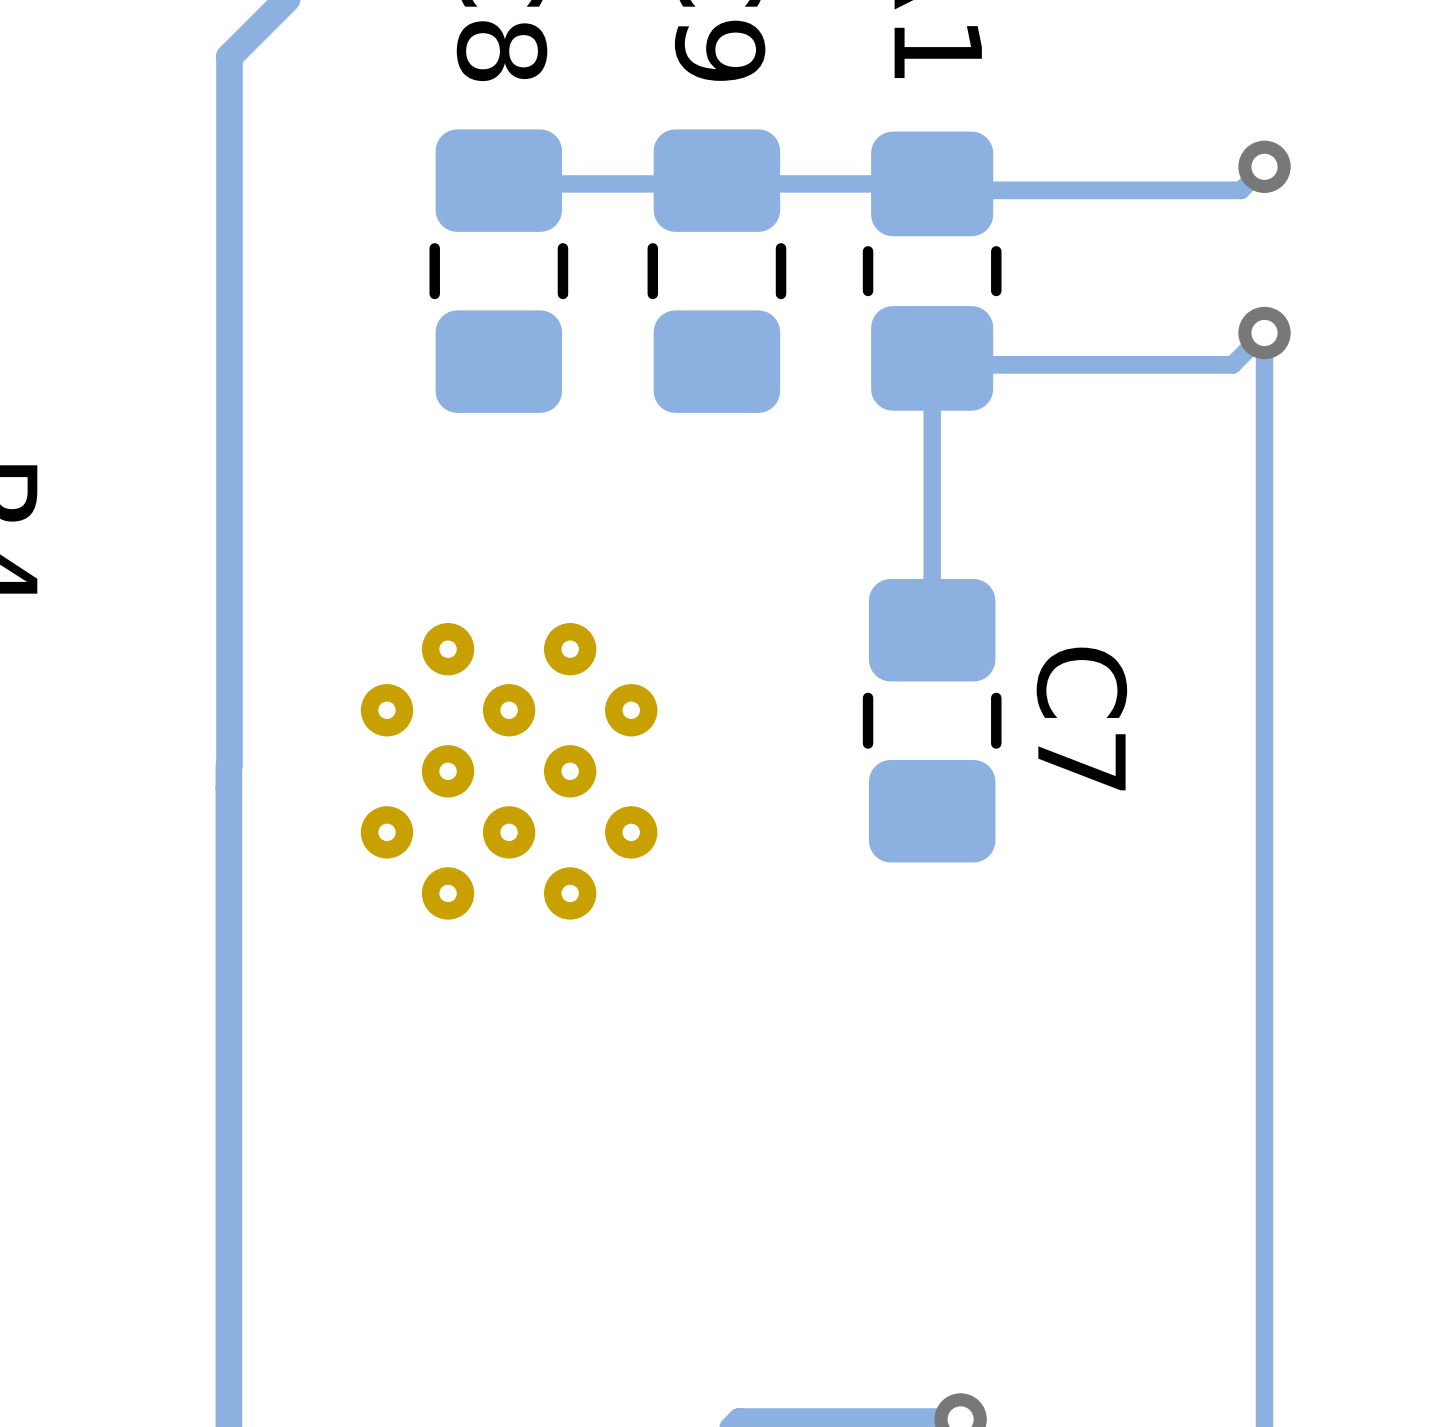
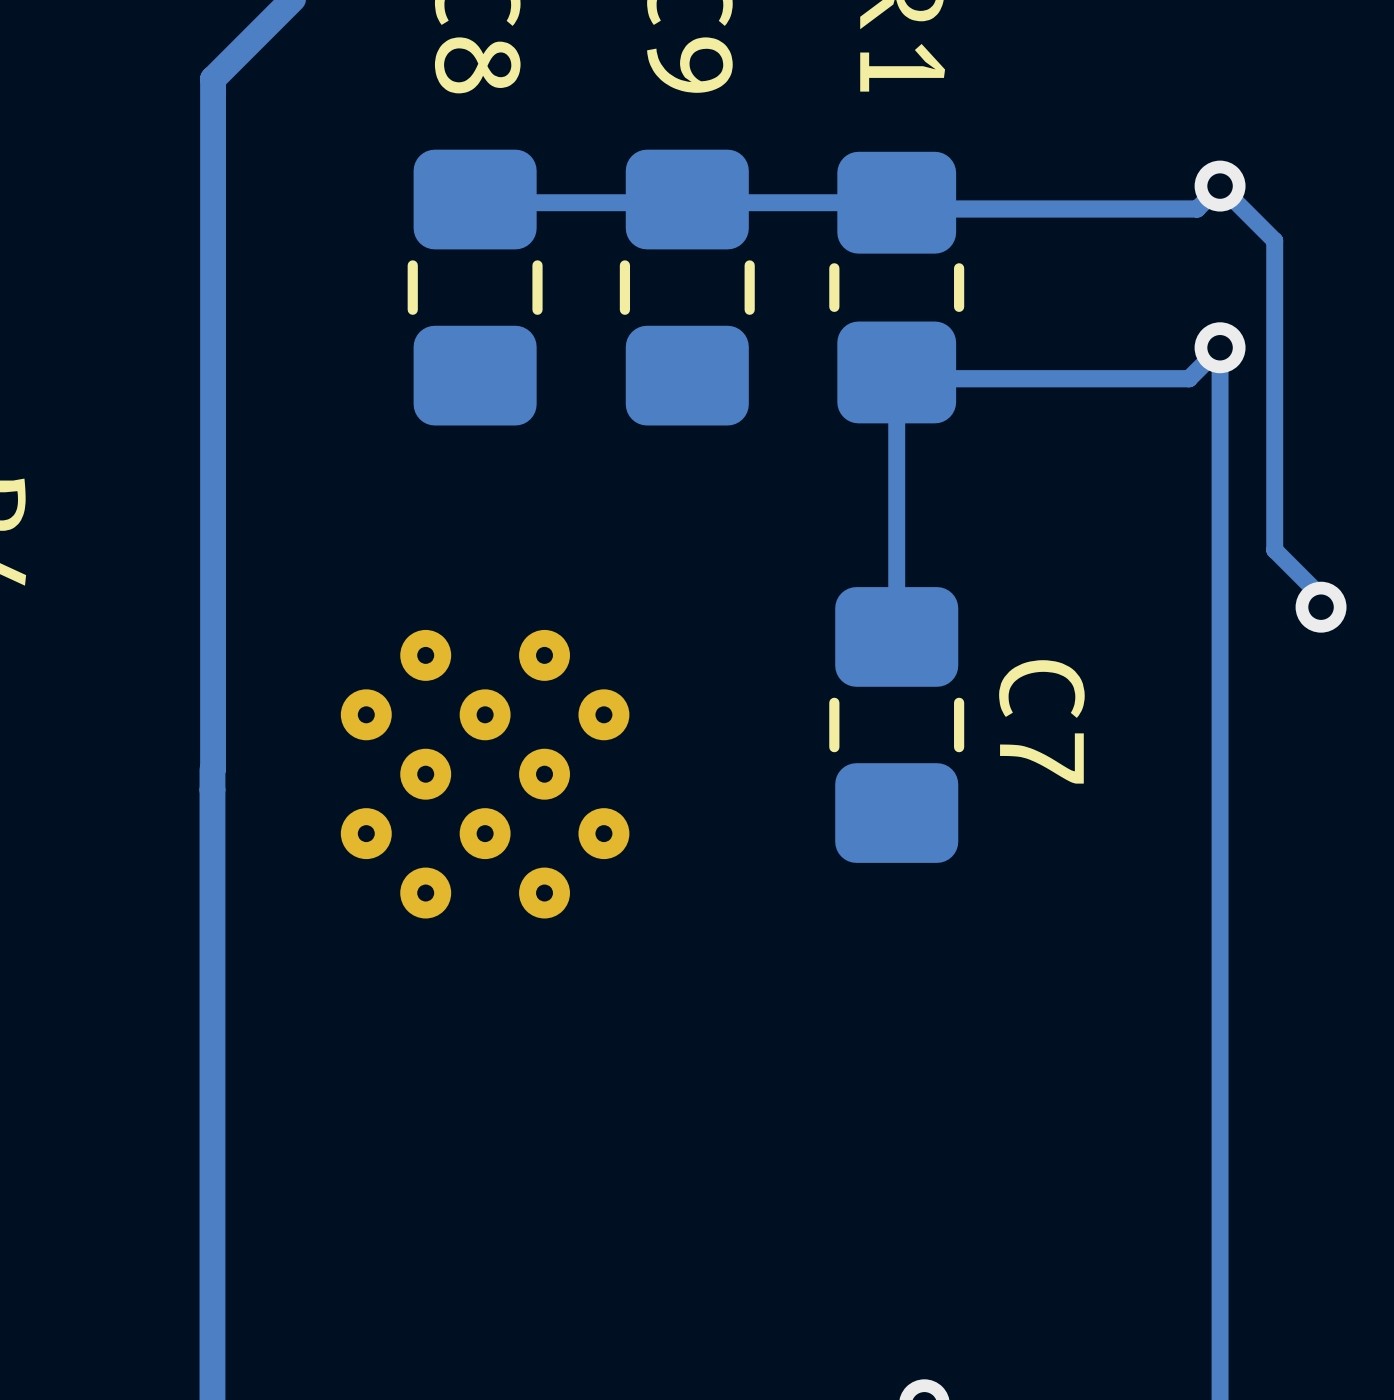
track: none -> (1220, 186) (1274, 240) (1274, 550) (1321, 596) (1321, 607)
via: none -> (1321, 607)

